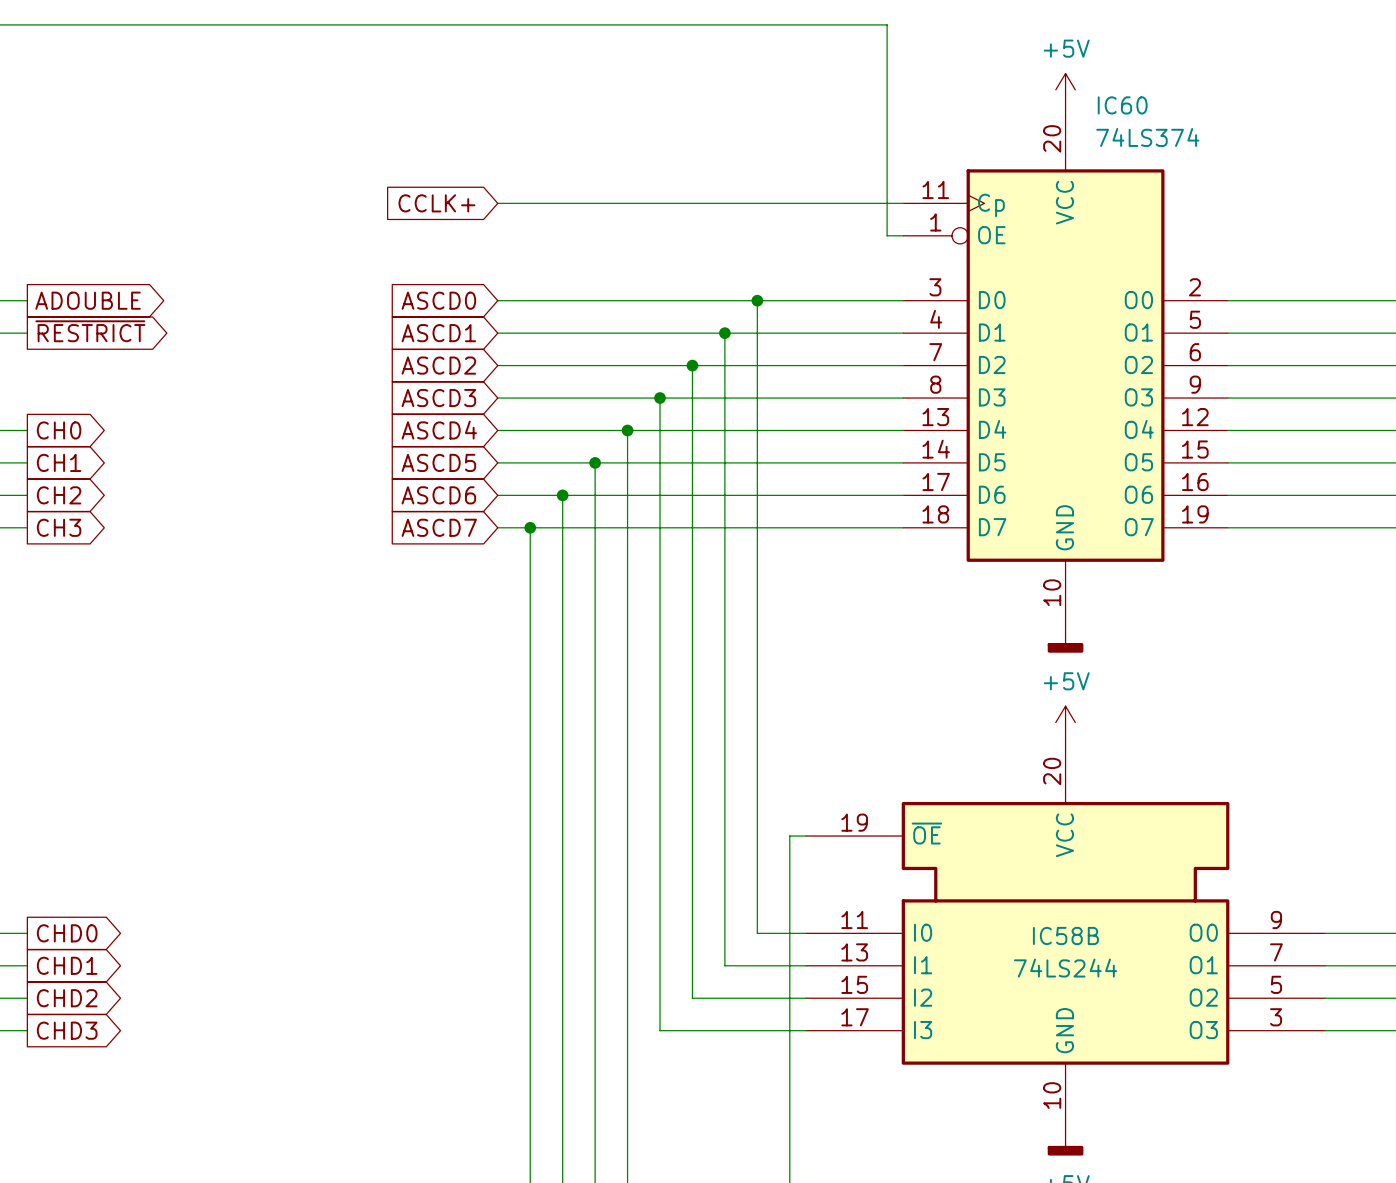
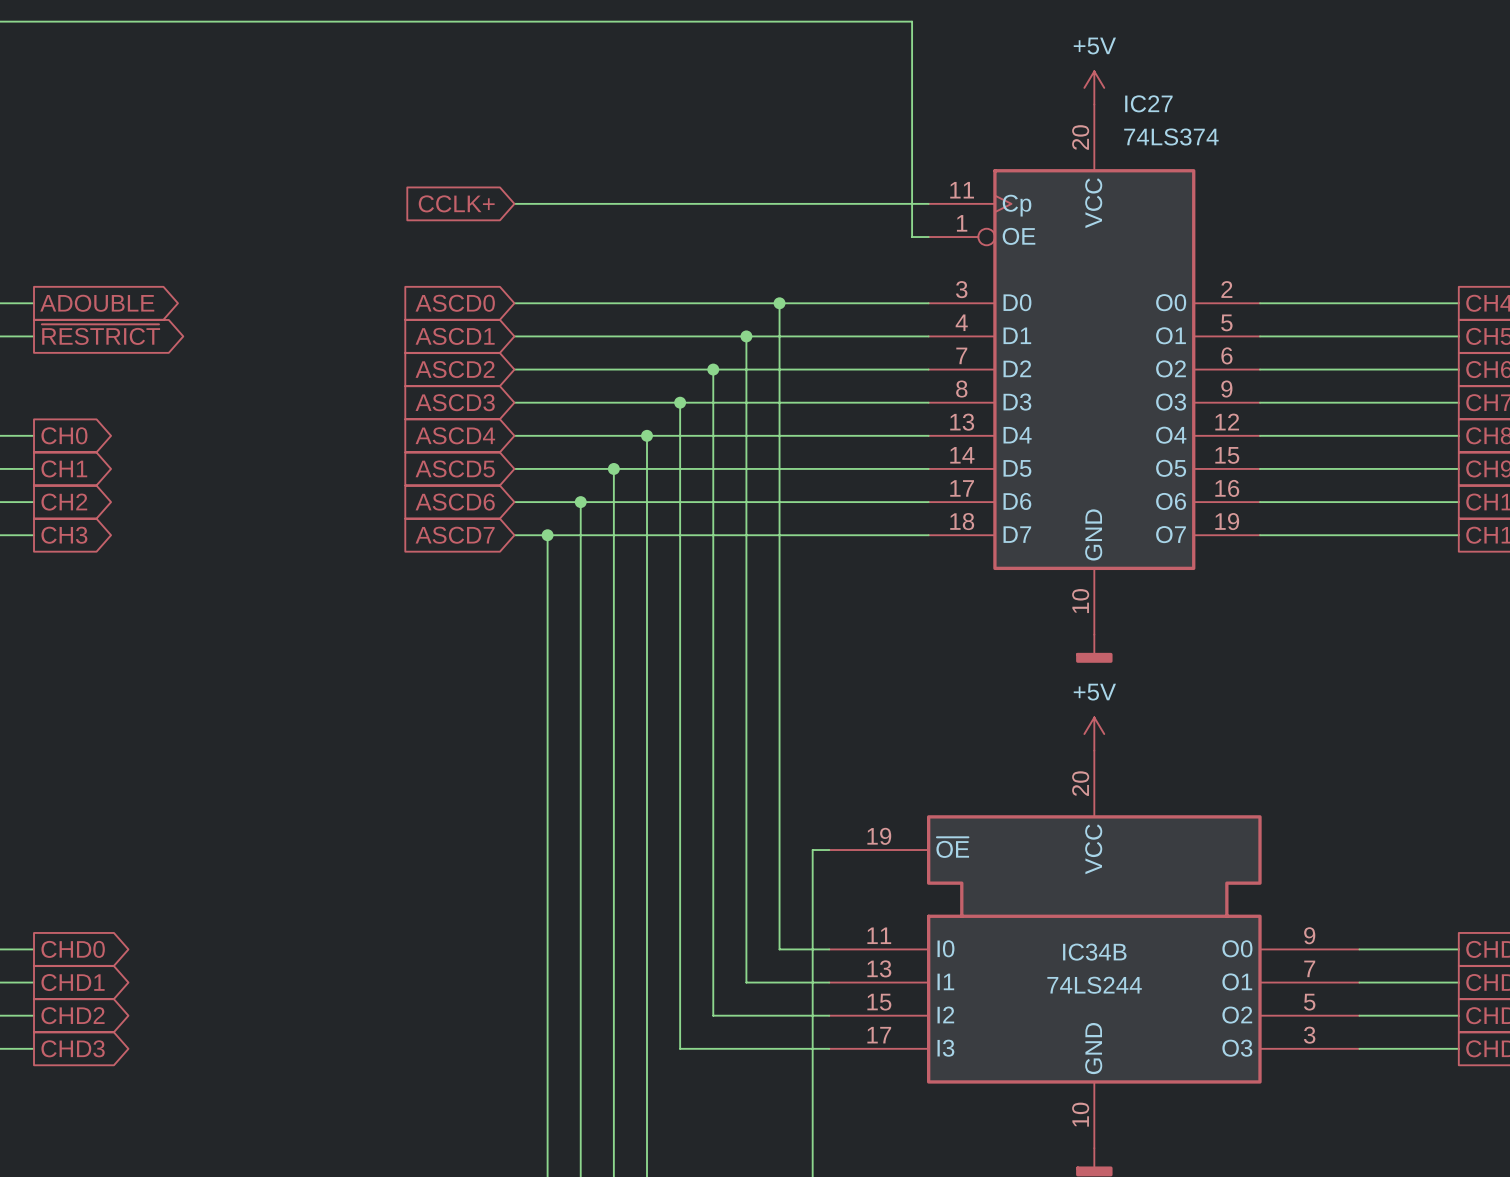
IC60 name: IC60 (1122, 105) -> IC27 (1148, 103)
IC58B name: IC58B (1065, 935) -> IC34B (1094, 952)

